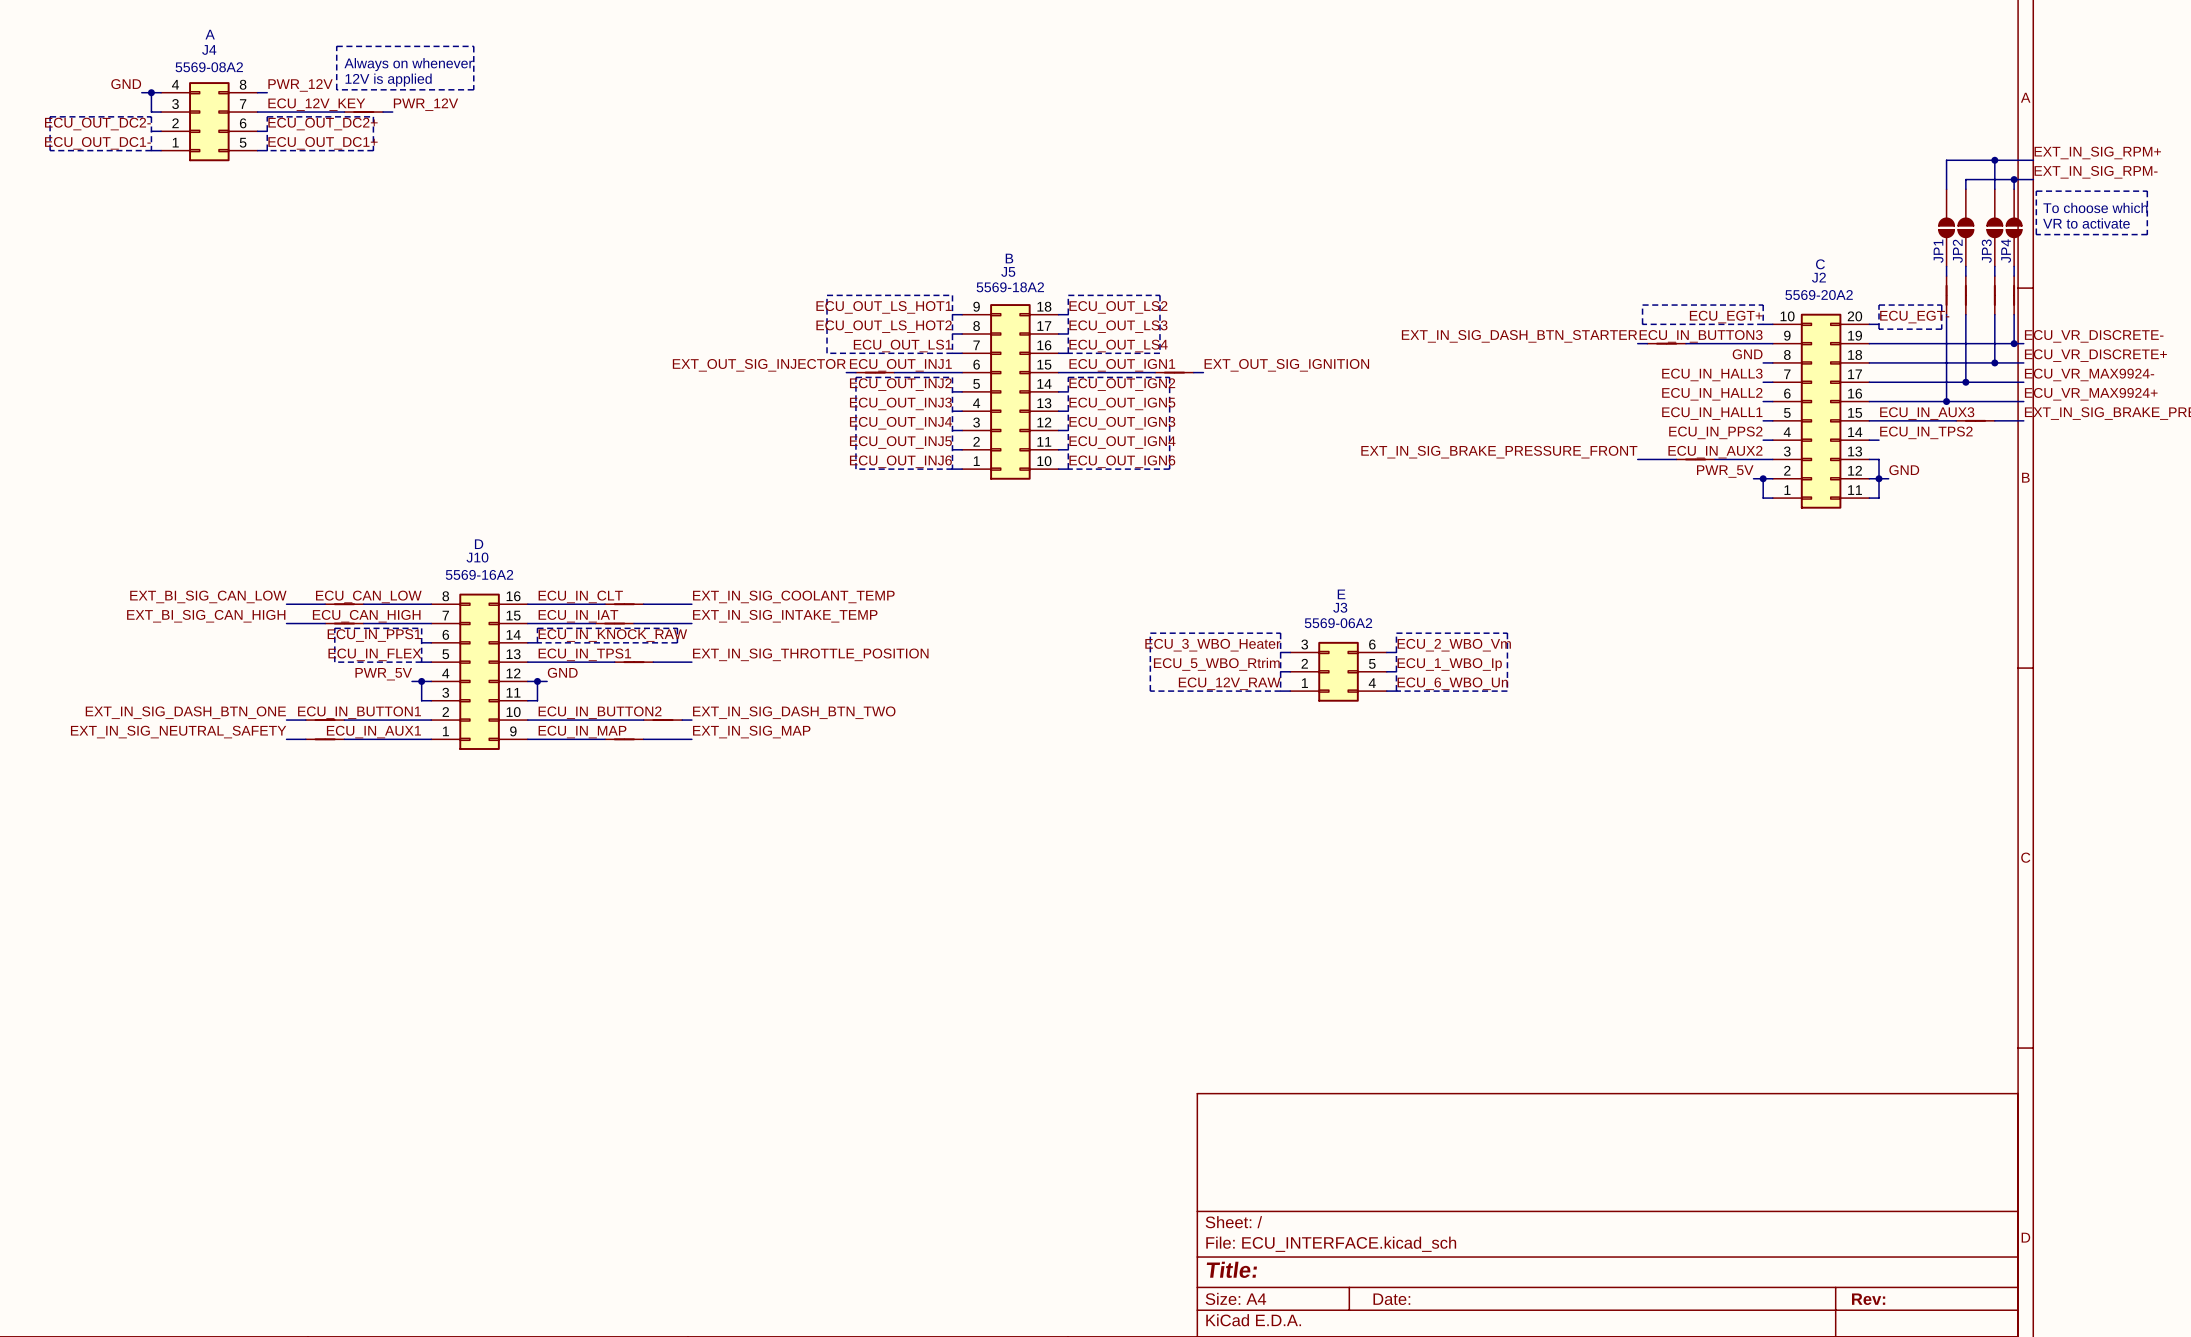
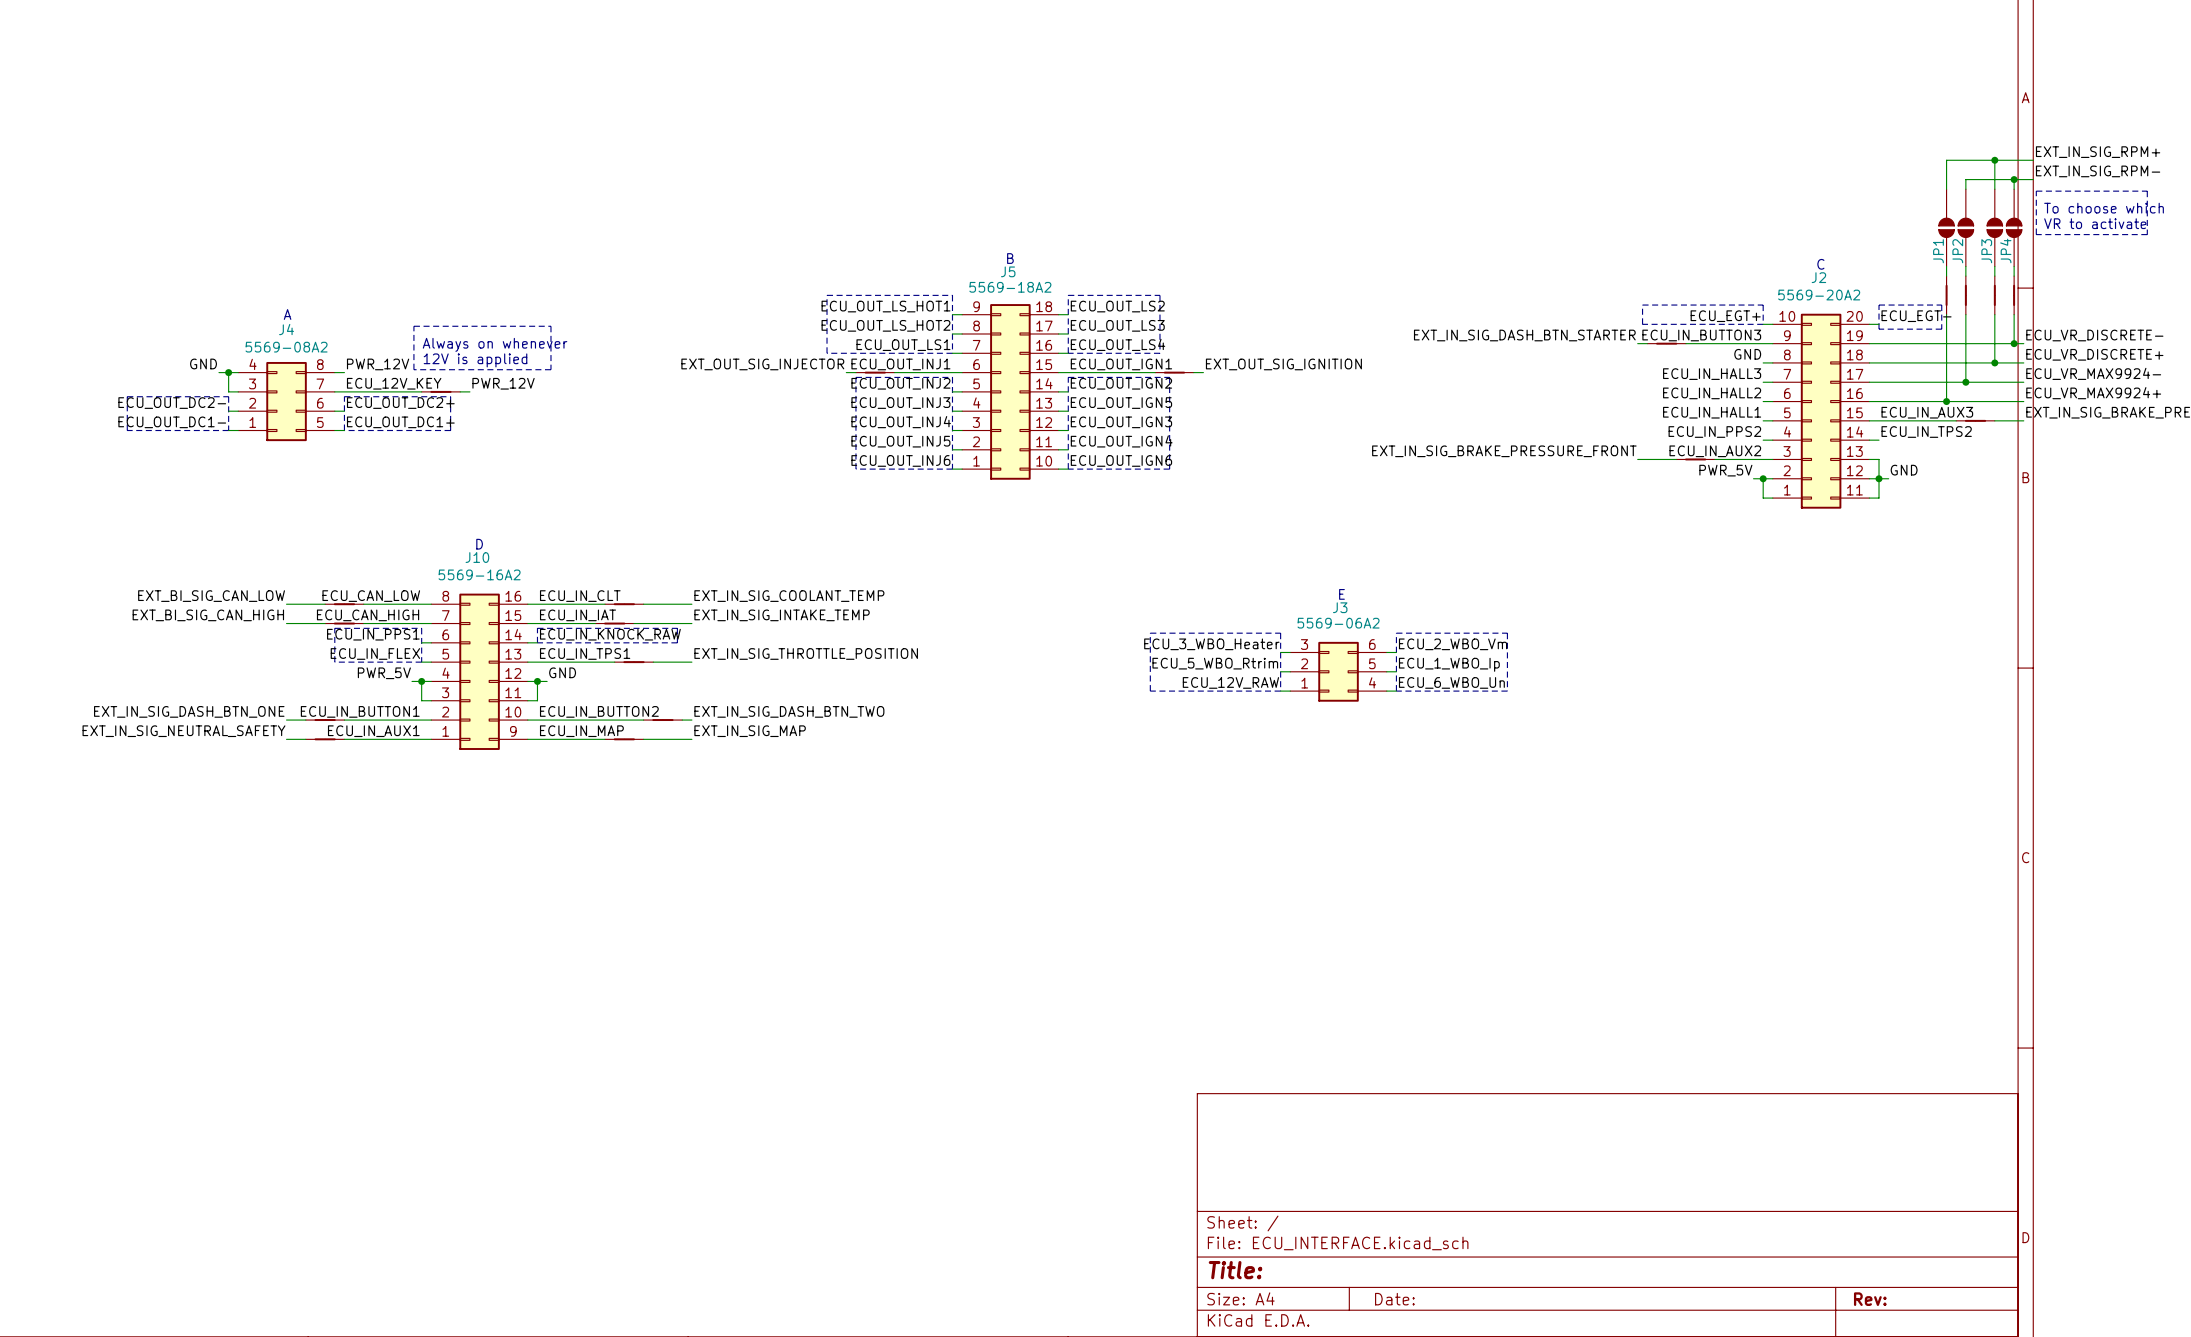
text: A (210, 34) -> none
line: (336, 46) (473, 46) (473, 89) (336, 89) (336, 46) -> none
text: Always on whenever (408, 64) -> none
text: 12V is applied (388, 80) -> none
label: GND (126, 84) -> none
label: PWR_12V (300, 85) -> none
wire: (141, 92) (161, 92) -> none
wire: (151, 92) (151, 112) (161, 112) -> none
junction: (151, 92) -> none
wire: (257, 92) (267, 92) -> none
label: ECU_12V_KEY (316, 104) -> none
label: PWR_12V (425, 104) -> none
wire: (257, 112) (344, 112) -> none
part: (363, 112) -> none
wire: (383, 112) (392, 112) -> none
line: (50, 116) (151, 116) (151, 150) (50, 150) (50, 116) -> none
line: (267, 116) (373, 116) (373, 150) (267, 150) (267, 116) -> none
J4 position: (209, 121) -> (286, 401)
label: ECU_OUT_DC2- (97, 124) -> none
label: ECU_OUT_DC2+ (323, 124) -> none
wire: (151, 131) (161, 131) -> none
wire: (257, 131) (267, 131) -> none
label: ECU_OUT_DC1- (97, 143) -> none
label: ECU_OUT_DC1+ (323, 143) -> none
wire: (151, 150) (161, 150) -> none
wire: (257, 150) (267, 150) -> none
text: none -> A (287, 314)
line: none -> (413, 326) (550, 326) (550, 369) (413, 369) (413, 326)
text: none -> Always on whenever (495, 344)
text: none -> 12V is applied (475, 360)
label: none -> GND (203, 363)
label: none -> PWR_12V (378, 364)
wire: none -> (218, 372) (238, 372)
wire: none -> (228, 372) (228, 391) (238, 391)
junction: none -> (228, 372)
wire: none -> (334, 372) (344, 372)
label: none -> ECU_12V_KEY (394, 383)
label: none -> PWR_12V (503, 383)
wire: none -> (334, 391) (421, 391)
part: none -> (440, 391)
wire: none -> (460, 391) (469, 391)
line: none -> (127, 396) (228, 396) (228, 430) (127, 430) (127, 396)
line: none -> (344, 396) (450, 396) (450, 430) (344, 430) (344, 396)
label: none -> ECU_OUT_DC2- (172, 403)
label: none -> ECU_OUT_DC2+ (400, 403)
wire: none -> (228, 411) (238, 411)
wire: none -> (334, 411) (344, 411)
label: none -> ECU_OUT_DC1- (172, 422)
label: none -> ECU_OUT_DC1+ (400, 422)
wire: none -> (228, 430) (238, 430)
wire: none -> (334, 430) (344, 430)

